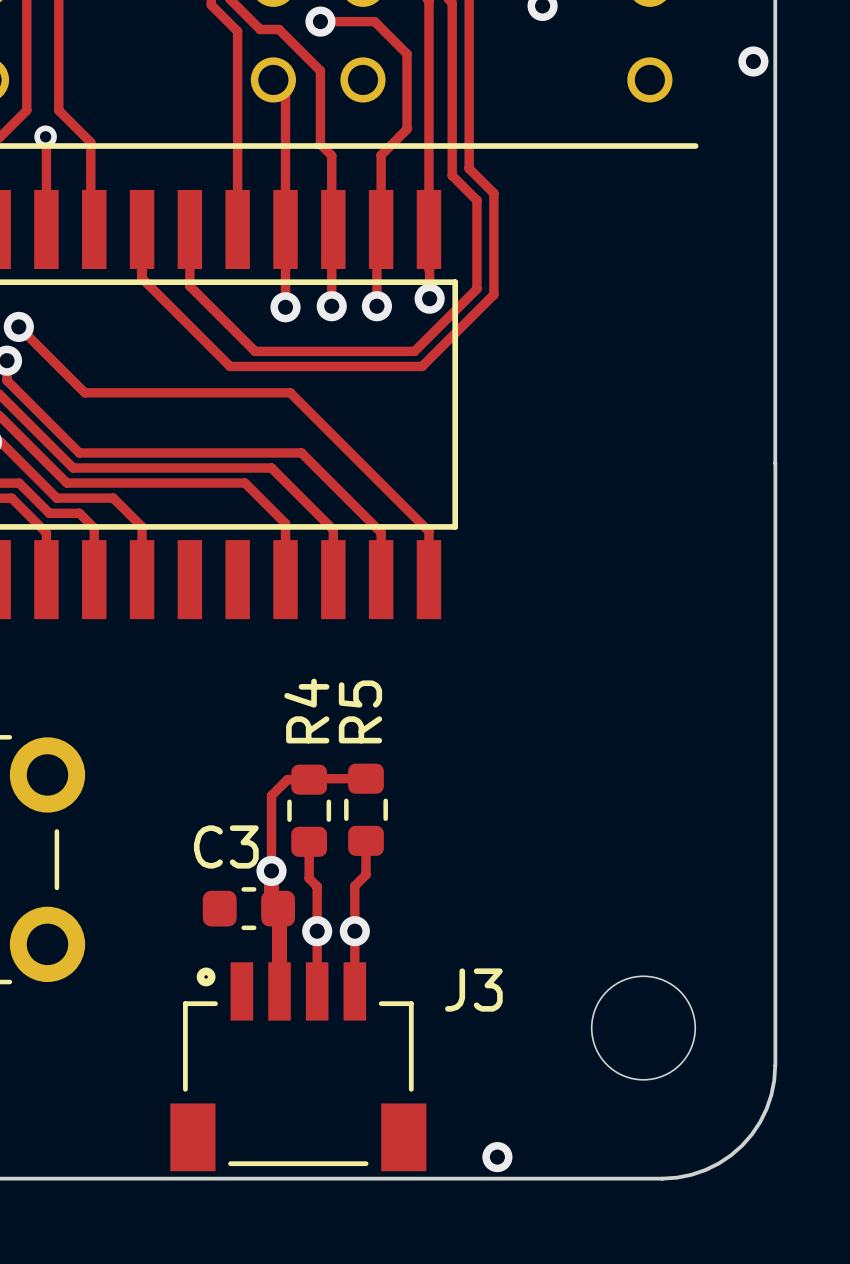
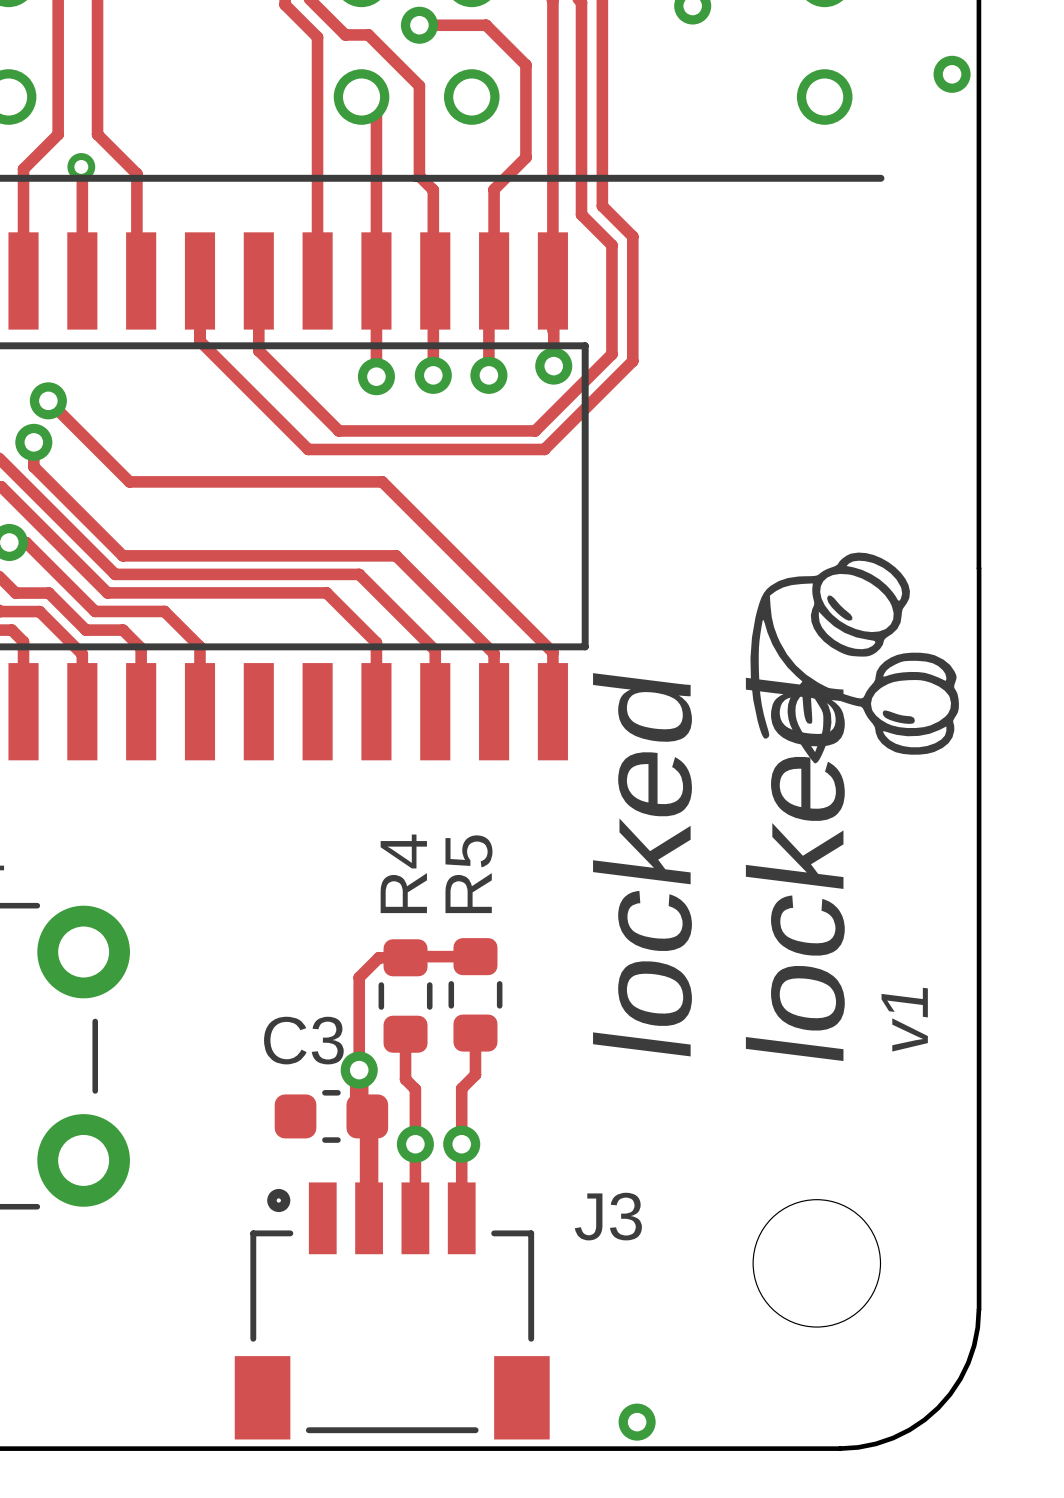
drawing: none -> [750, 552, 959, 764]
text: none -> locked (642, 864)
text: none -> locked (795, 869)
text: none -> v1 (904, 1019)

